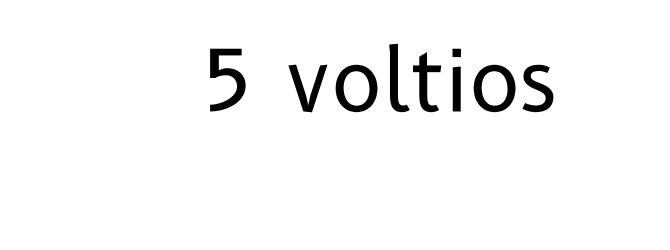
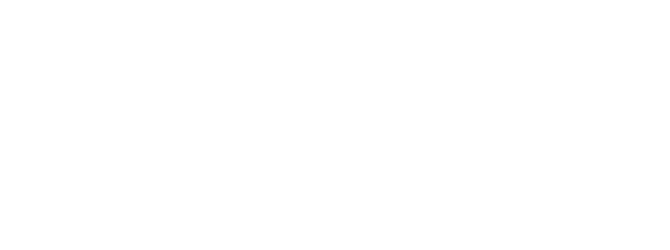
text: 5 voltios (381, 78) -> none

